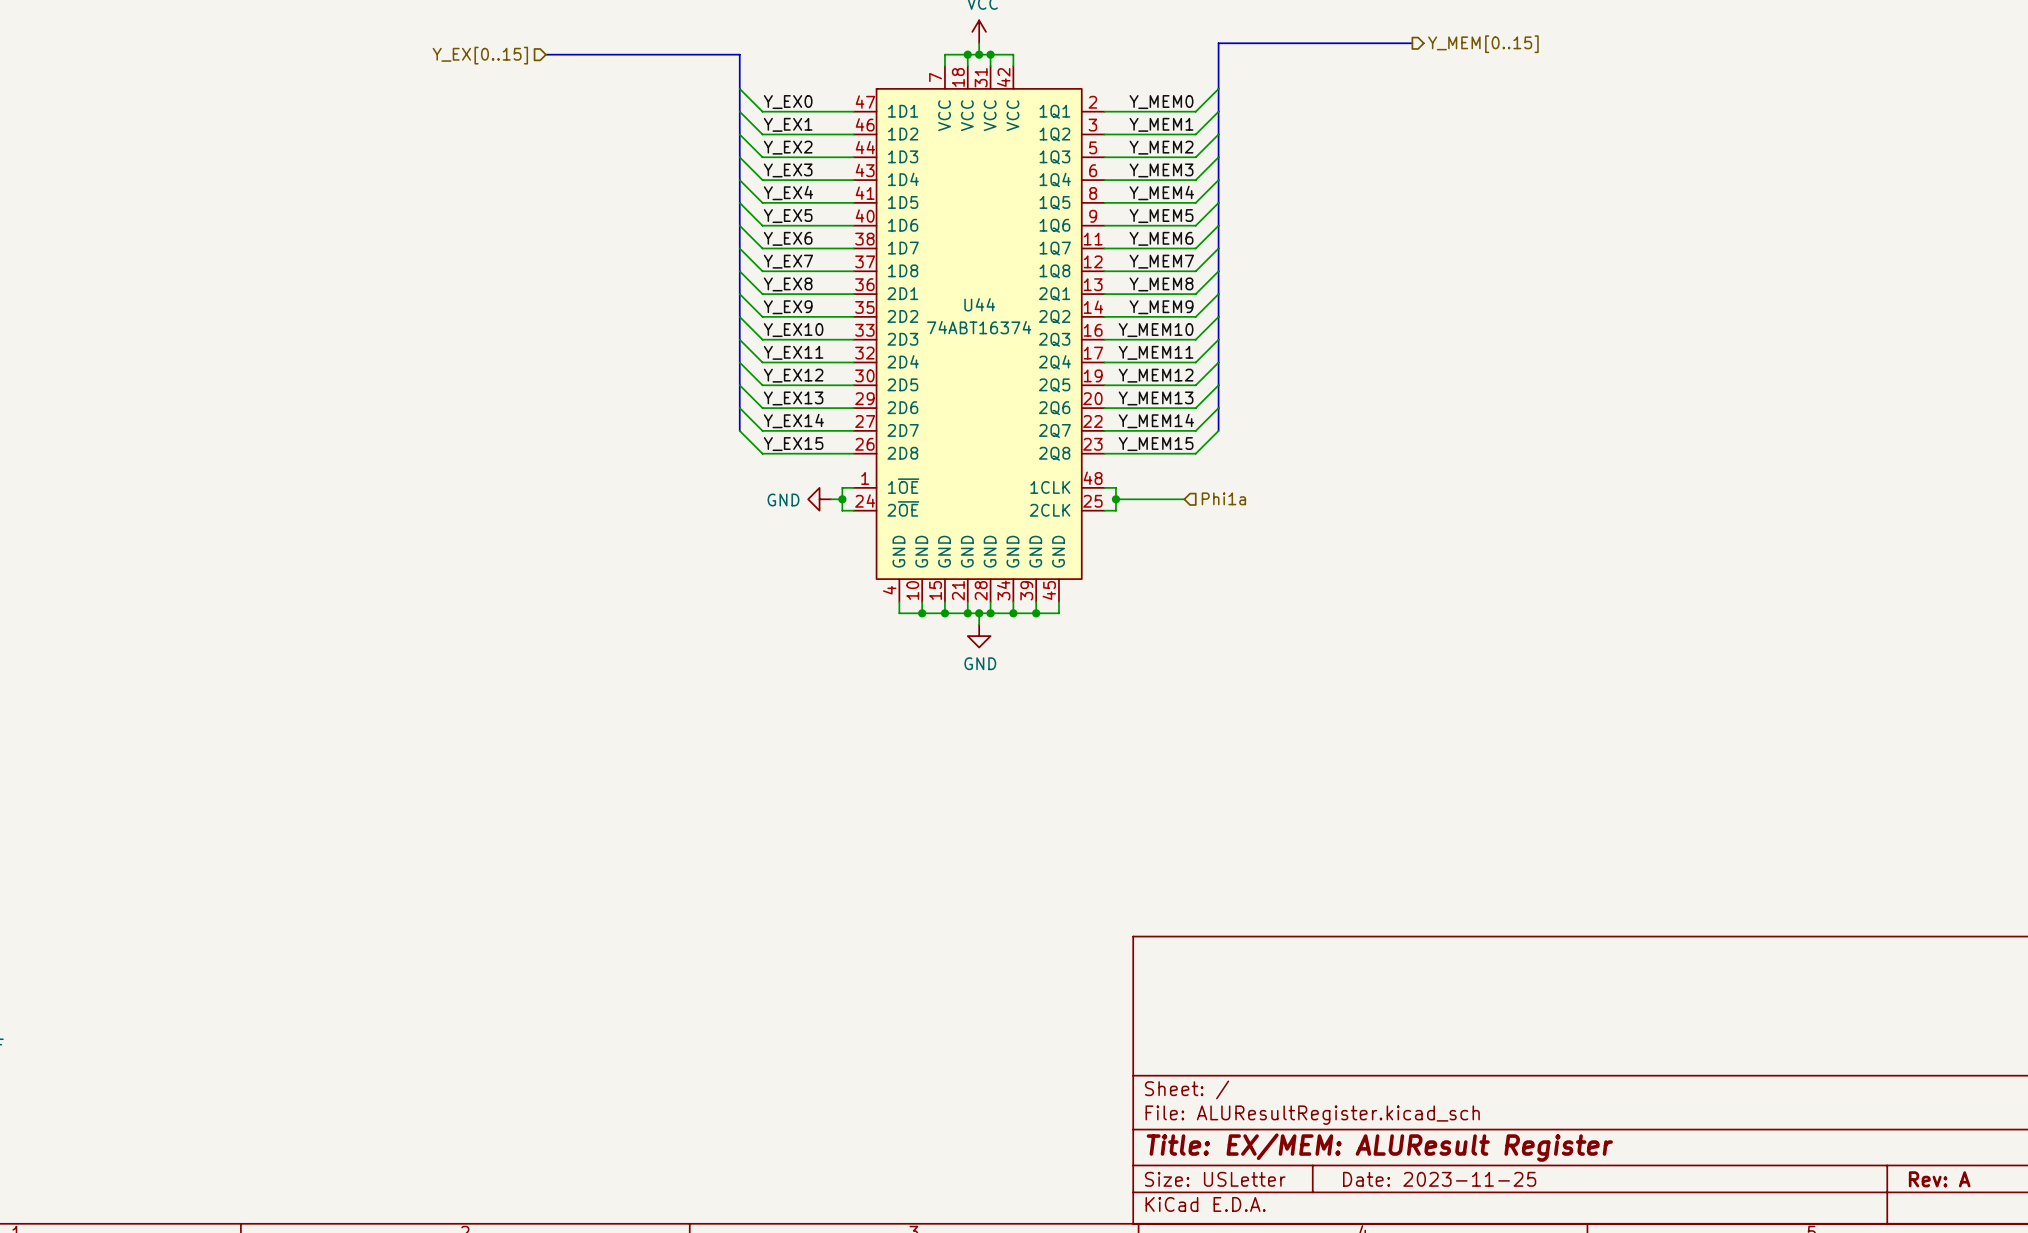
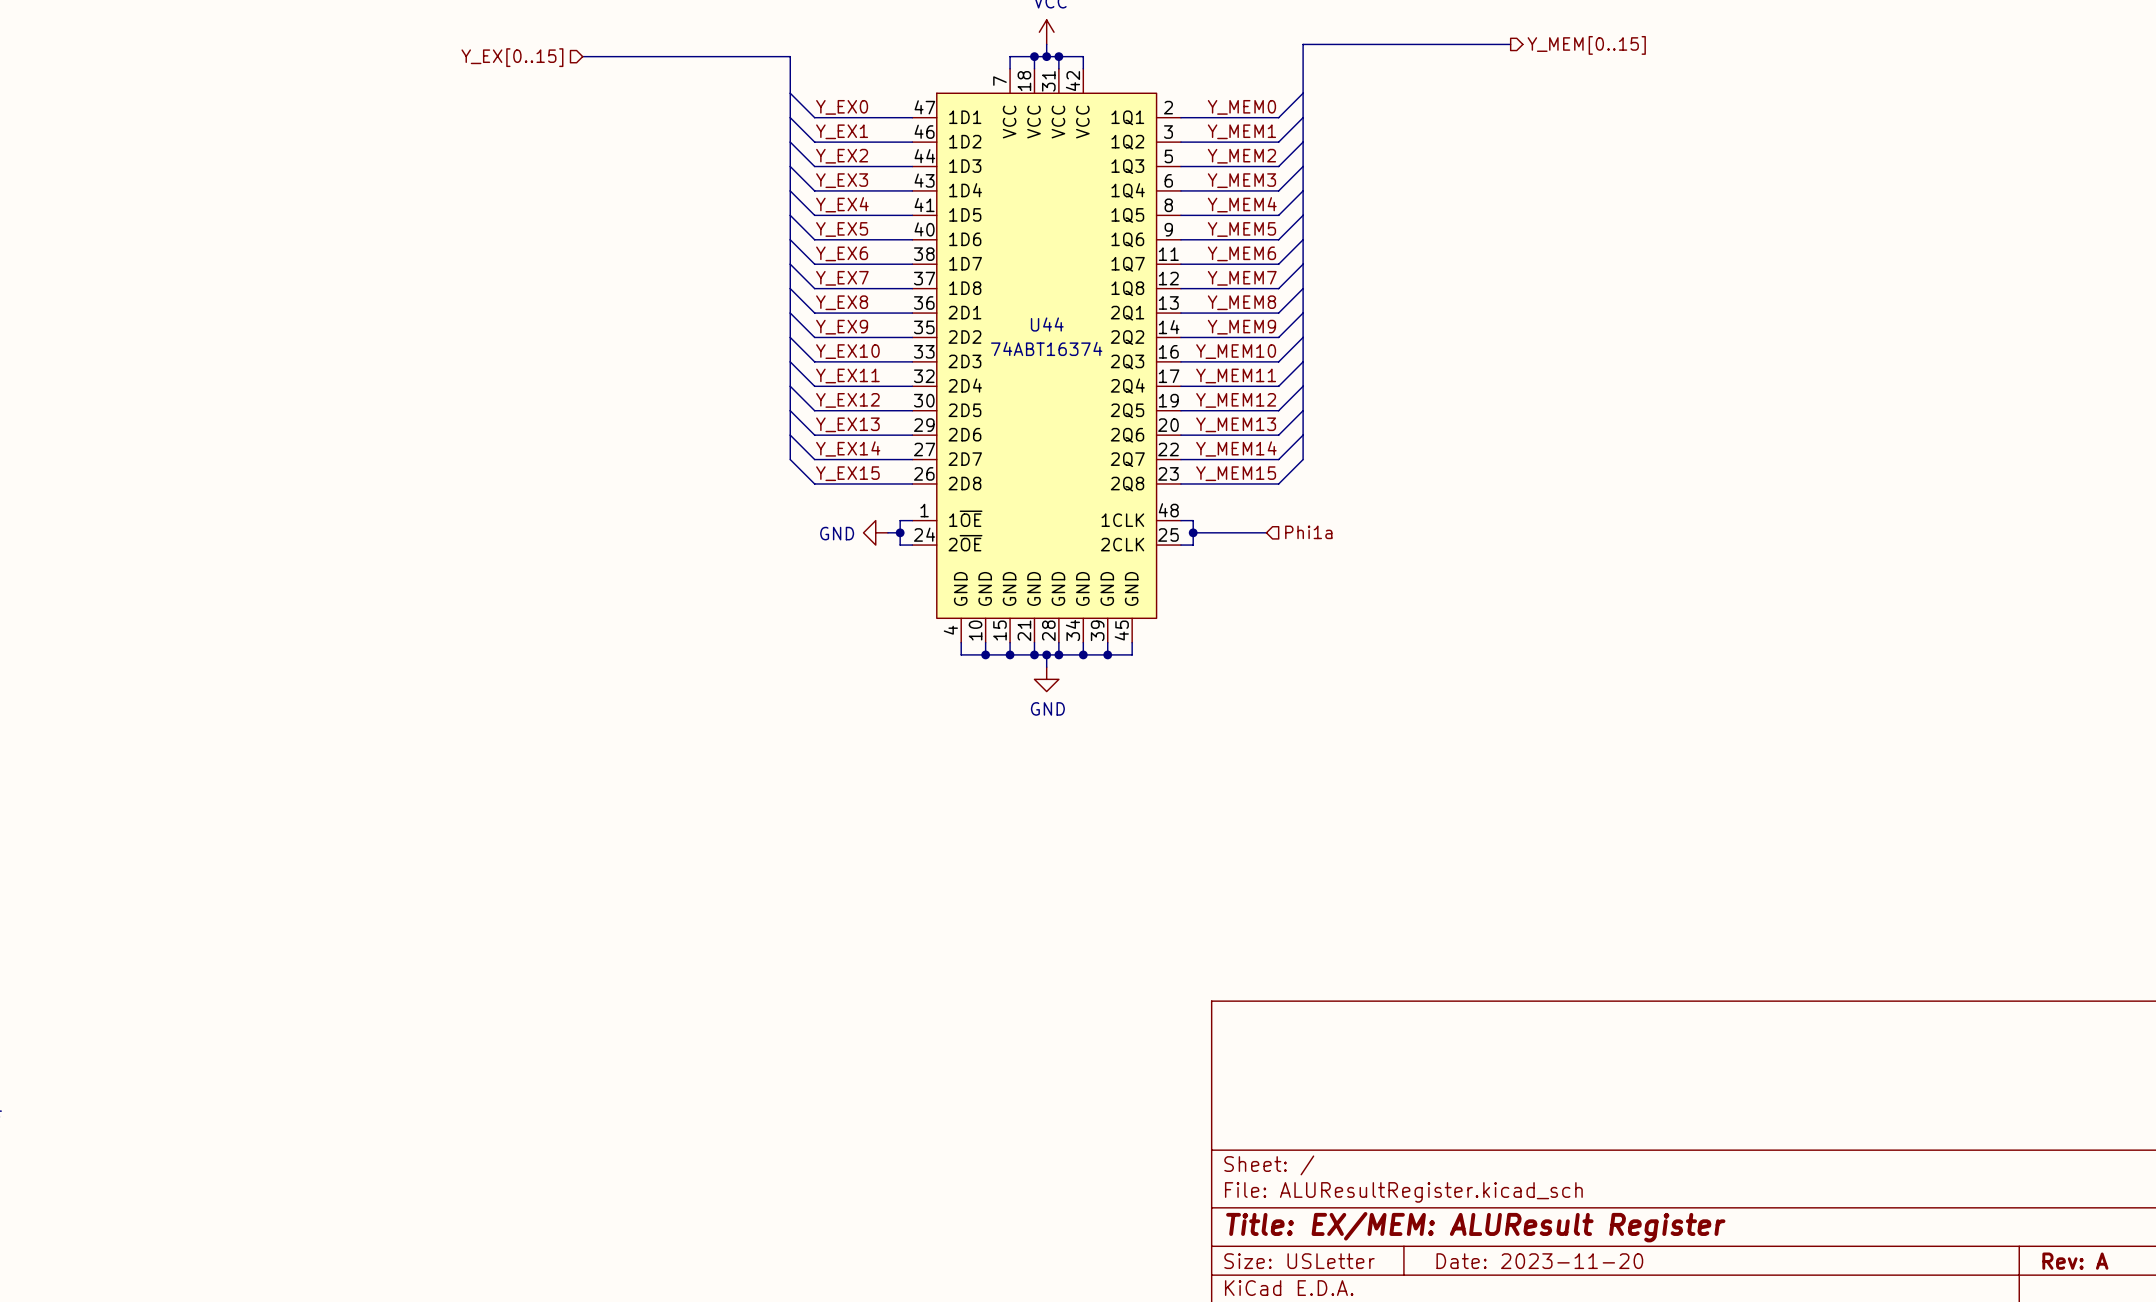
title block: Date: 2023-11-25 (1439, 1179) -> Date: 2023-11-20 (1539, 1261)

